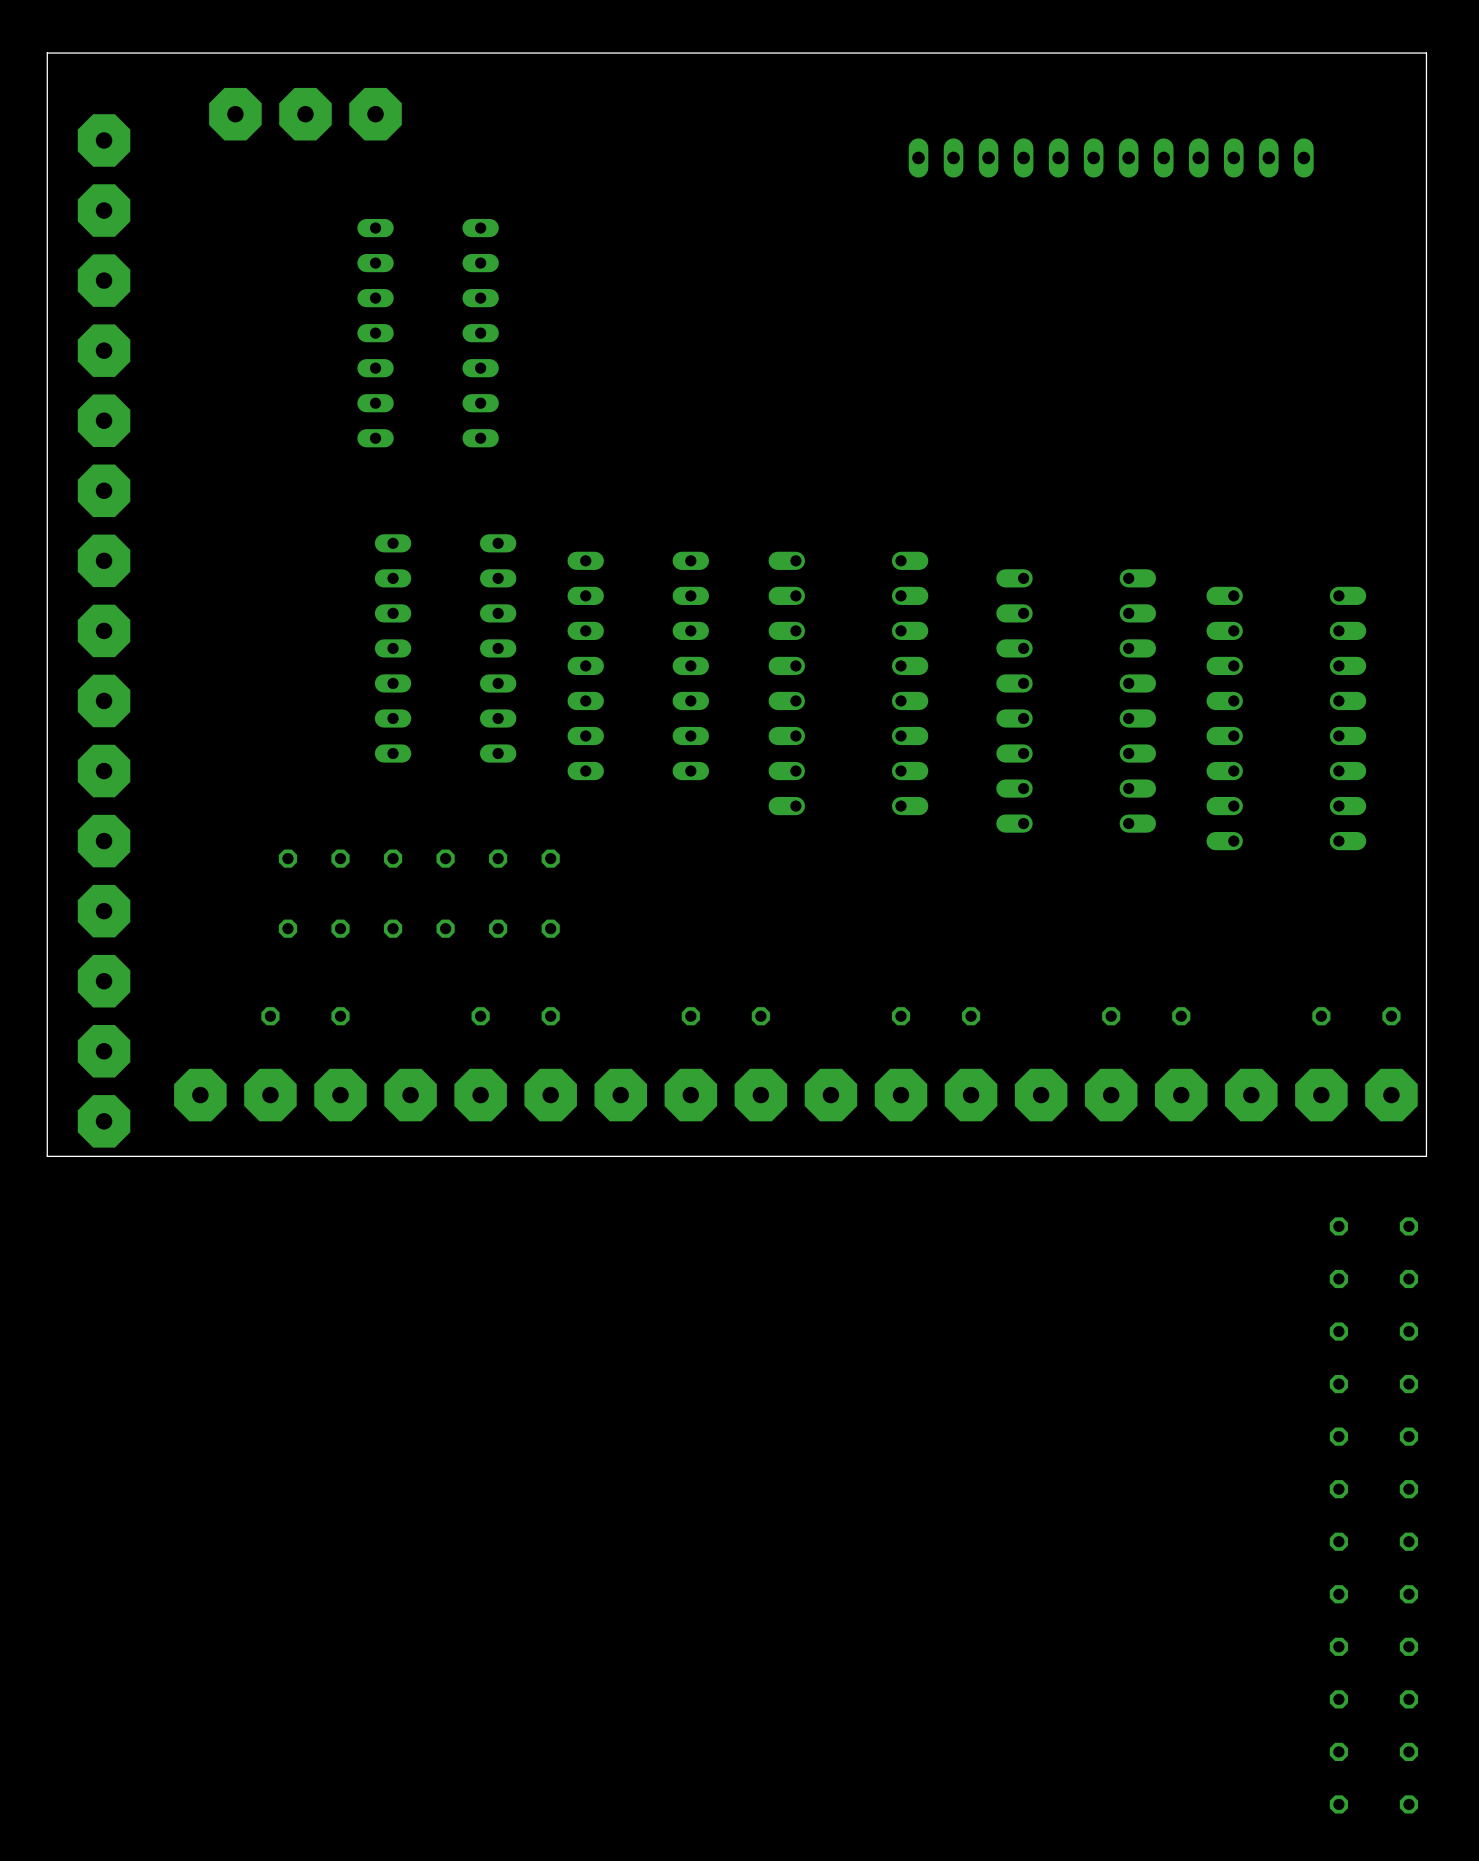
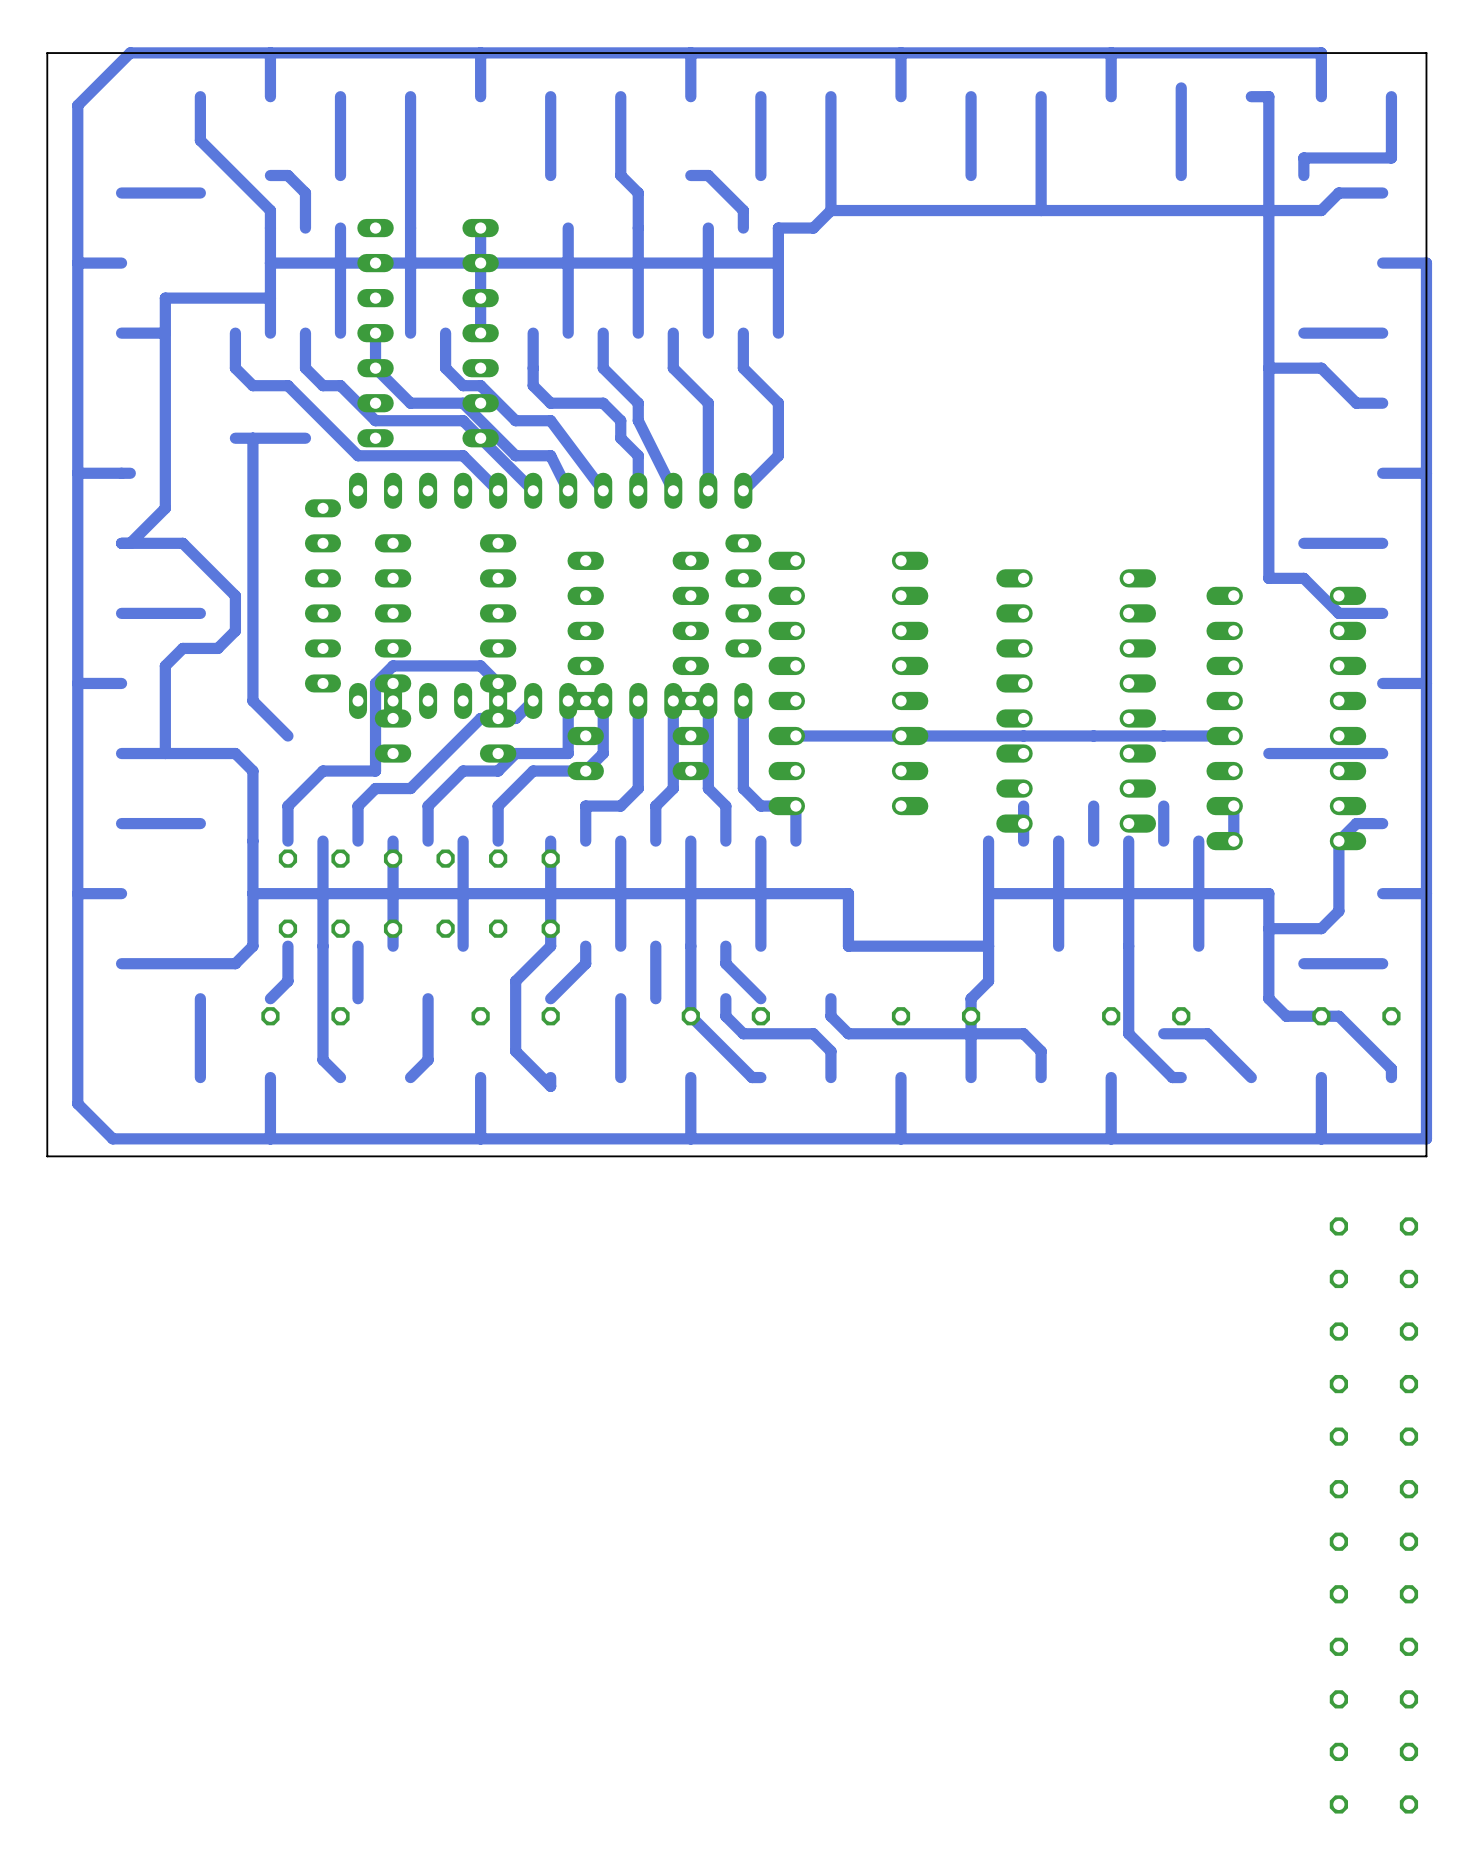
track: none -> (270, 52) (270, 96)
track: none -> (480, 52) (480, 96)
track: none -> (690, 52) (690, 96)
track: none -> (901, 52) (901, 96)
track: none -> (1111, 52) (1111, 96)
track: none -> (1181, 87) (1181, 175)
track: none -> (200, 96) (200, 140) (270, 210) (270, 333)
track: none -> (340, 96) (340, 175)
track: none -> (410, 96) (410, 333)
track: none -> (550, 96) (550, 175)
track: none -> (620, 96) (620, 175) (638, 193) (638, 333)
track: none -> (760, 96) (760, 175)
track: none -> (830, 96) (830, 210)
track: none -> (971, 96) (971, 175)
track: none -> (1041, 96) (1041, 210)
track: none -> (1251, 96) (1268, 96) (1268, 578) (1303, 578) (1338, 613) (1382, 613)
track: none -> (1321, 96) (1321, 52) (130, 52) (77, 105) (77, 1103) (112, 1138) (1426, 1138) (1426, 263) (1382, 263)
track: none -> (1391, 96) (1391, 157) (1303, 157) (1303, 175)
part: (305, 114) -> none
part: (1111, 157) -> none
track: none -> (270, 175) (287, 175) (305, 193) (305, 228)
track: none -> (690, 175) (708, 175) (743, 210) (743, 228)
track: none -> (200, 193) (121, 193)
track: none -> (1382, 193) (1338, 193) (1321, 210) (830, 210)
part: (104, 210) -> none
track: none -> (830, 210) (813, 228) (778, 228) (778, 333)
track: none -> (340, 228) (340, 333)
track: none -> (480, 228) (480, 333)
track: none -> (568, 228) (568, 333)
track: none -> (708, 228) (708, 333)
track: none -> (121, 263) (77, 263)
track: none -> (778, 263) (270, 263)
track: none -> (270, 298) (165, 298) (165, 508) (130, 543)
track: none -> (165, 333) (121, 333)
track: none -> (235, 333) (235, 368) (252, 385) (287, 385) (358, 455) (463, 455) (498, 490)
track: none -> (305, 333) (305, 368) (322, 385) (340, 385) (375, 420) (463, 420) (533, 490)
track: none -> (375, 333) (375, 368) (410, 403) (463, 403) (515, 455) (550, 455) (568, 490)
track: none -> (445, 333) (445, 368) (463, 385) (480, 385) (515, 420) (550, 420) (603, 490)
track: none -> (533, 333) (533, 385) (550, 403) (603, 403) (620, 420) (620, 438) (638, 455) (638, 490)
track: none -> (603, 333) (603, 368) (638, 403) (638, 420) (673, 490)
track: none -> (673, 333) (673, 368) (708, 403) (708, 490)
track: none -> (743, 333) (743, 368) (778, 403) (778, 455) (743, 490)
track: none -> (1382, 333) (1303, 333)
track: none -> (1268, 368) (1321, 368) (1356, 403) (1382, 403)
part: (104, 420) -> none
track: none -> (252, 438) (252, 700) (287, 736)
track: none -> (305, 438) (235, 438)
track: none -> (130, 473) (77, 473)
track: none -> (1426, 473) (1382, 473)
track: none -> (121, 543) (182, 543) (235, 595) (235, 630) (217, 648) (182, 648) (165, 665) (165, 753)
track: none -> (1382, 543) (1303, 543)
part: none -> (533, 595)
track: none -> (200, 613) (121, 613)
part: (104, 630) -> none
track: none -> (121, 683) (77, 683)
track: none -> (1426, 683) (1382, 683)
track: none -> (498, 700) (498, 683) (480, 665) (393, 665) (375, 683) (375, 771) (322, 771) (287, 806) (287, 841)
track: none -> (533, 700) (515, 718) (480, 718) (410, 788) (375, 788) (358, 806) (358, 841)
track: none -> (568, 700) (568, 753) (515, 753) (498, 771) (463, 771) (428, 806) (428, 841)
track: none -> (603, 700) (603, 753) (585, 771) (533, 771) (498, 806) (498, 841)
track: none -> (638, 700) (638, 788) (620, 806) (585, 806) (585, 841)
track: none -> (673, 700) (673, 788) (655, 806) (655, 841)
track: none -> (708, 700) (708, 788) (725, 806) (725, 841)
track: none -> (743, 700) (743, 788) (760, 806) (795, 806) (795, 841)
track: none -> (1233, 736) (795, 736)
track: none -> (121, 753) (235, 753) (252, 771) (252, 946) (235, 963) (121, 963)
track: none -> (1382, 753) (1268, 753)
track: none -> (1023, 806) (1023, 841)
track: none -> (1093, 806) (1093, 841)
track: none -> (1163, 806) (1163, 841)
track: none -> (1233, 806) (1233, 841)
track: none -> (200, 823) (121, 823)
track: none -> (1382, 823) (1356, 823) (1338, 841) (1338, 911) (1321, 928) (1268, 928)
part: (104, 841) -> none
track: none -> (322, 841) (322, 1060) (340, 1077)
track: none -> (393, 841) (393, 946)
track: none -> (463, 841) (463, 946)
track: none -> (550, 841) (550, 946) (515, 981) (515, 1051) (550, 1086) (550, 1077)
track: none -> (620, 841) (620, 946)
track: none -> (690, 841) (690, 1016) (752, 1077) (760, 1077)
track: none -> (760, 841) (760, 946)
track: none -> (988, 841) (988, 981) (971, 998) (971, 1077)
track: none -> (1058, 841) (1058, 946)
track: none -> (1128, 841) (1128, 1033) (1172, 1077) (1181, 1077)
track: none -> (1198, 841) (1198, 946)
track: none -> (121, 893) (77, 893)
track: none -> (252, 893) (848, 893) (848, 946) (988, 946)
track: none -> (988, 893) (1268, 893) (1268, 998) (1286, 1016) (1338, 1016) (1391, 1068) (1391, 1077)
track: none -> (1426, 893) (1382, 893)
track: none -> (287, 946) (287, 981) (270, 998)
track: none -> (358, 946) (358, 998)
track: none -> (585, 946) (585, 963) (550, 998)
track: none -> (655, 946) (655, 998)
track: none -> (725, 946) (725, 963) (760, 998)
track: none -> (1382, 963) (1303, 963)
track: none -> (200, 998) (200, 1077)
track: none -> (428, 998) (428, 1060) (410, 1077)
track: none -> (620, 998) (620, 1077)
track: none -> (725, 998) (725, 1016) (743, 1033) (813, 1033) (830, 1051) (830, 1077)
track: none -> (830, 998) (830, 1016) (848, 1033) (1023, 1033) (1041, 1051) (1041, 1077)
track: none -> (1163, 1033) (1207, 1033) (1251, 1077)
part: (104, 1051) -> none
track: none -> (270, 1077) (270, 1138)
track: none -> (480, 1077) (480, 1138)
track: none -> (690, 1077) (690, 1138)
track: none -> (901, 1077) (901, 1138)
track: none -> (1111, 1077) (1111, 1138)
track: none -> (1321, 1077) (1321, 1138)
part: (270, 1095) -> none
part: (480, 1095) -> none
part: (690, 1095) -> none
part: (901, 1095) -> none
part: (1111, 1095) -> none
part: (1321, 1095) -> none

